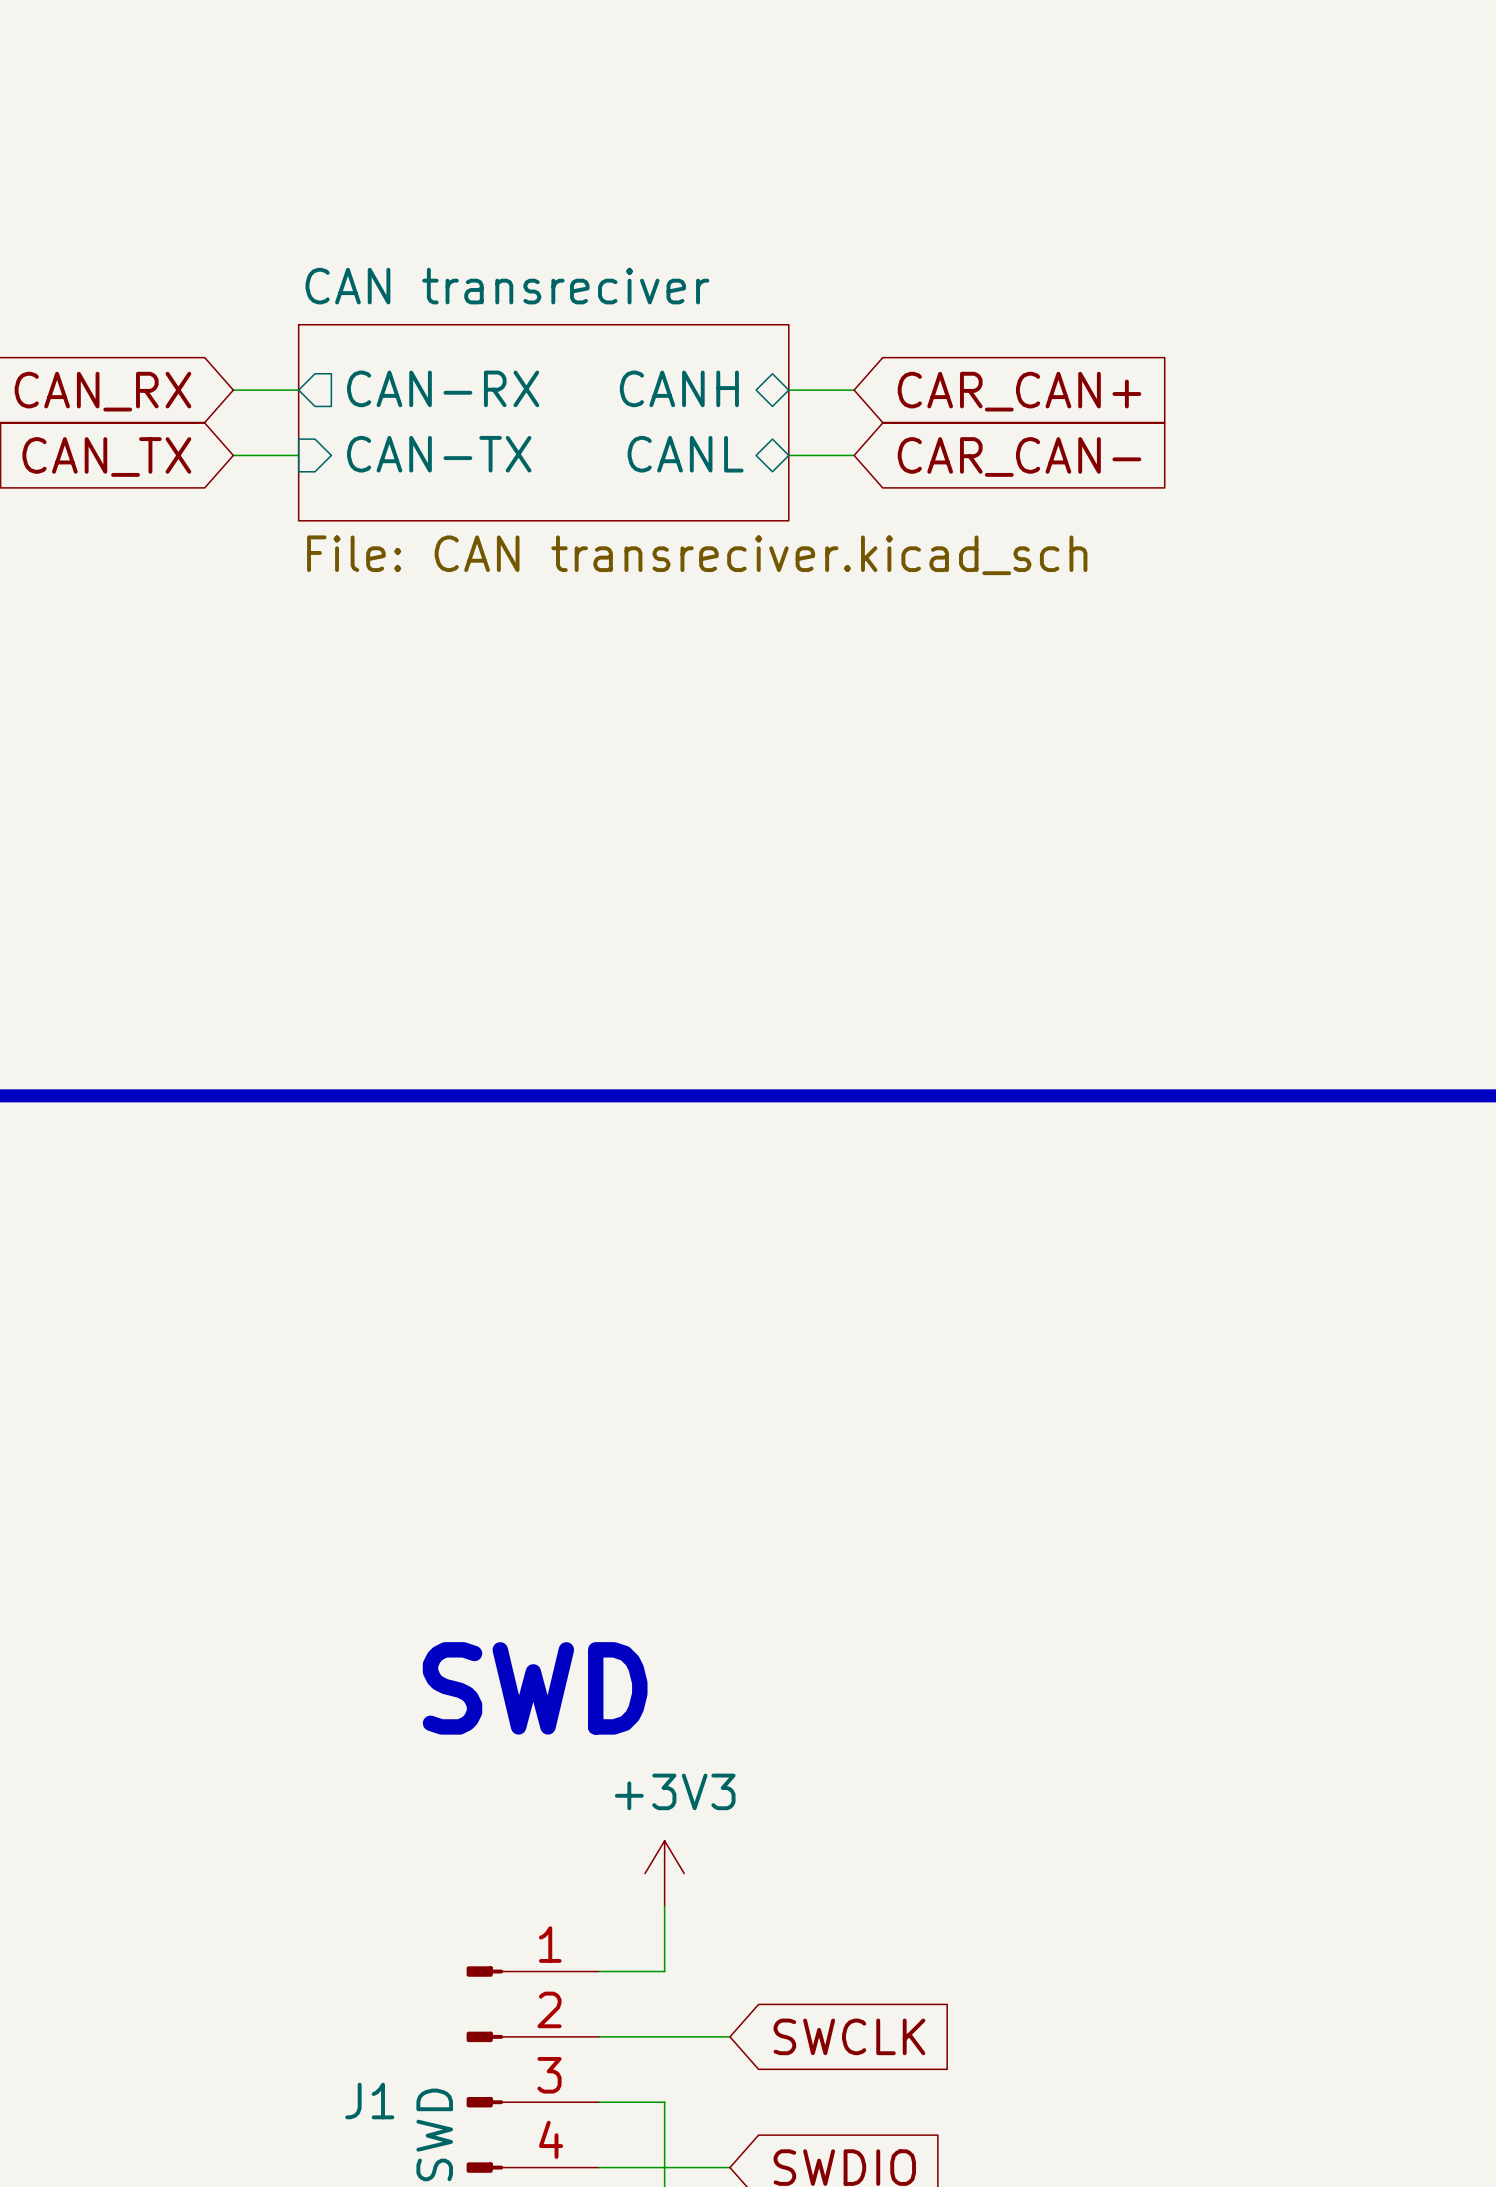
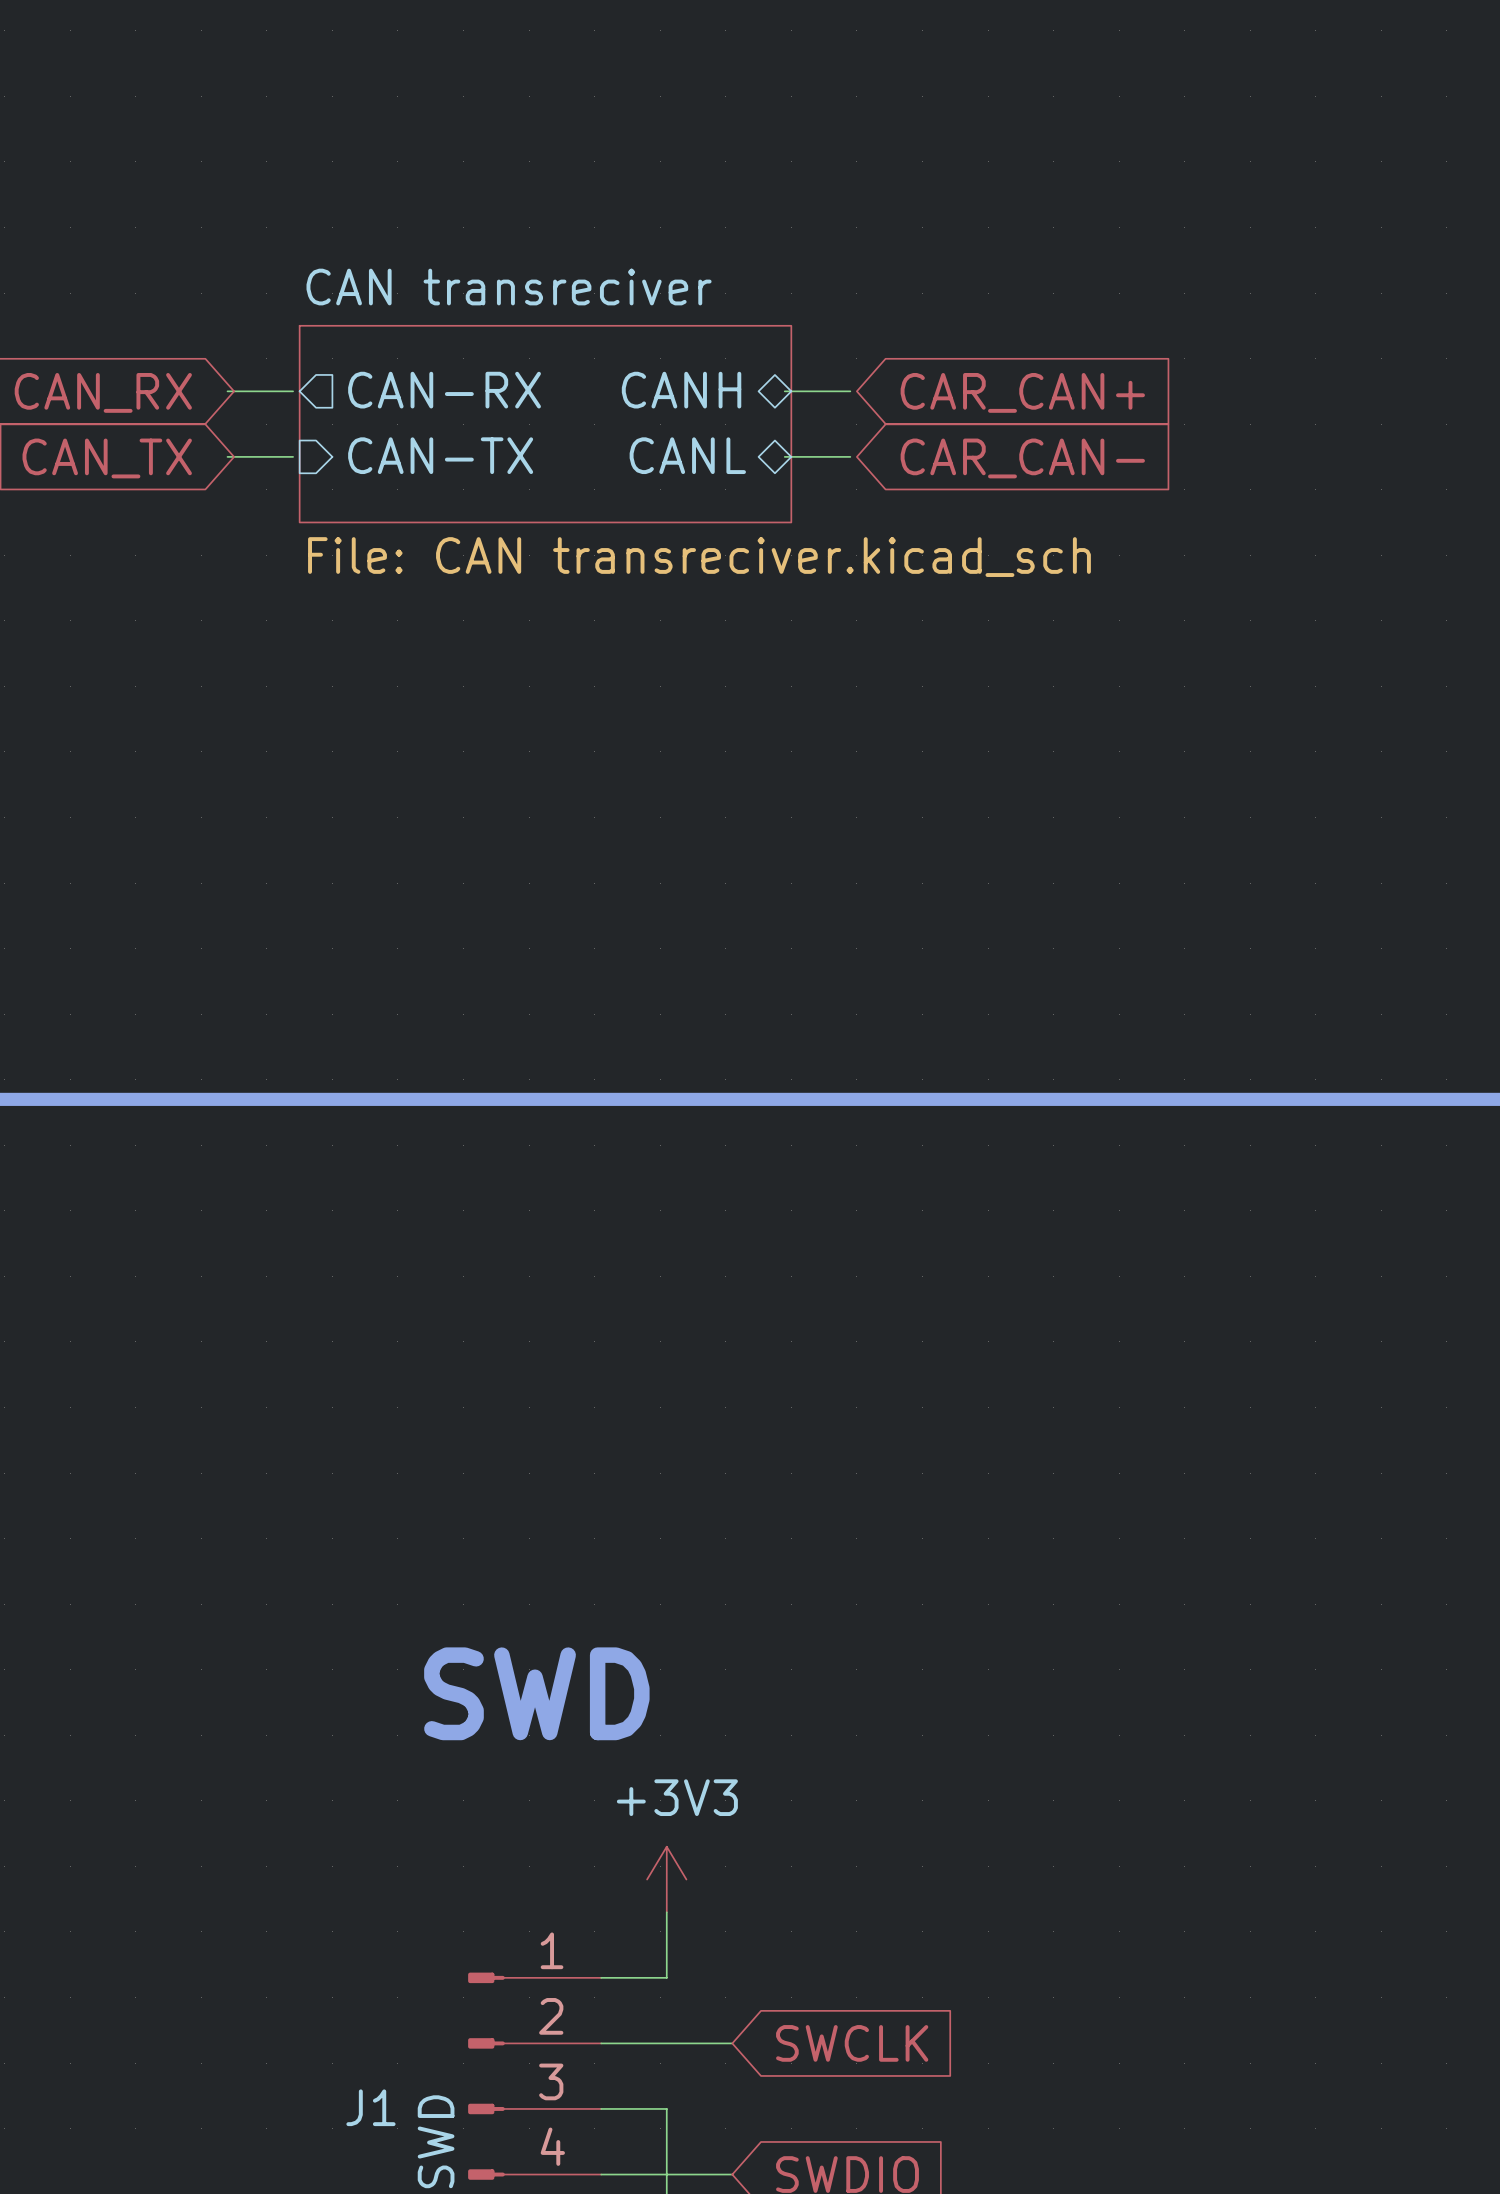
wire: (292, 390) (298, 390) -> (227, 391) (234, 391)
wire: (847, 390) (854, 390) -> (784, 391) (791, 391)
wire: (292, 455) (298, 455) -> (227, 456) (234, 456)
wire: (847, 455) (854, 455) -> (784, 456) (791, 456)

